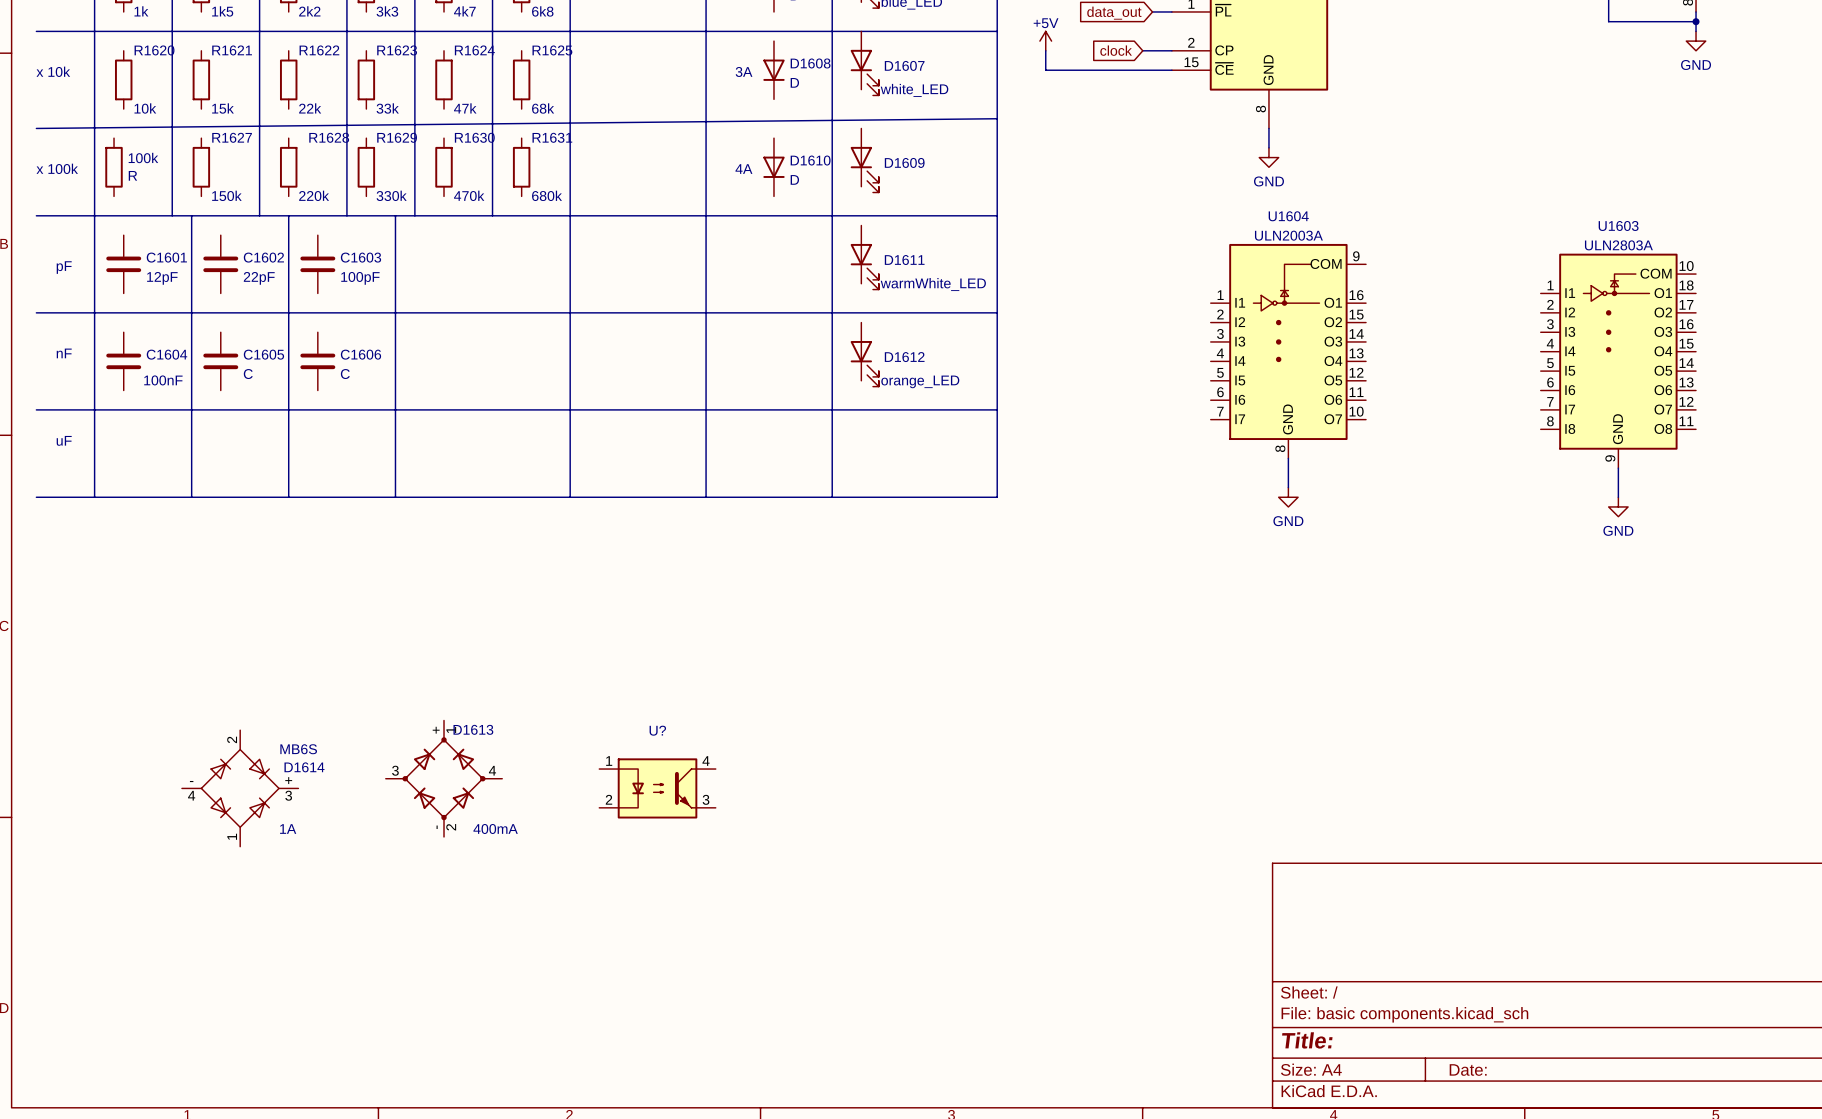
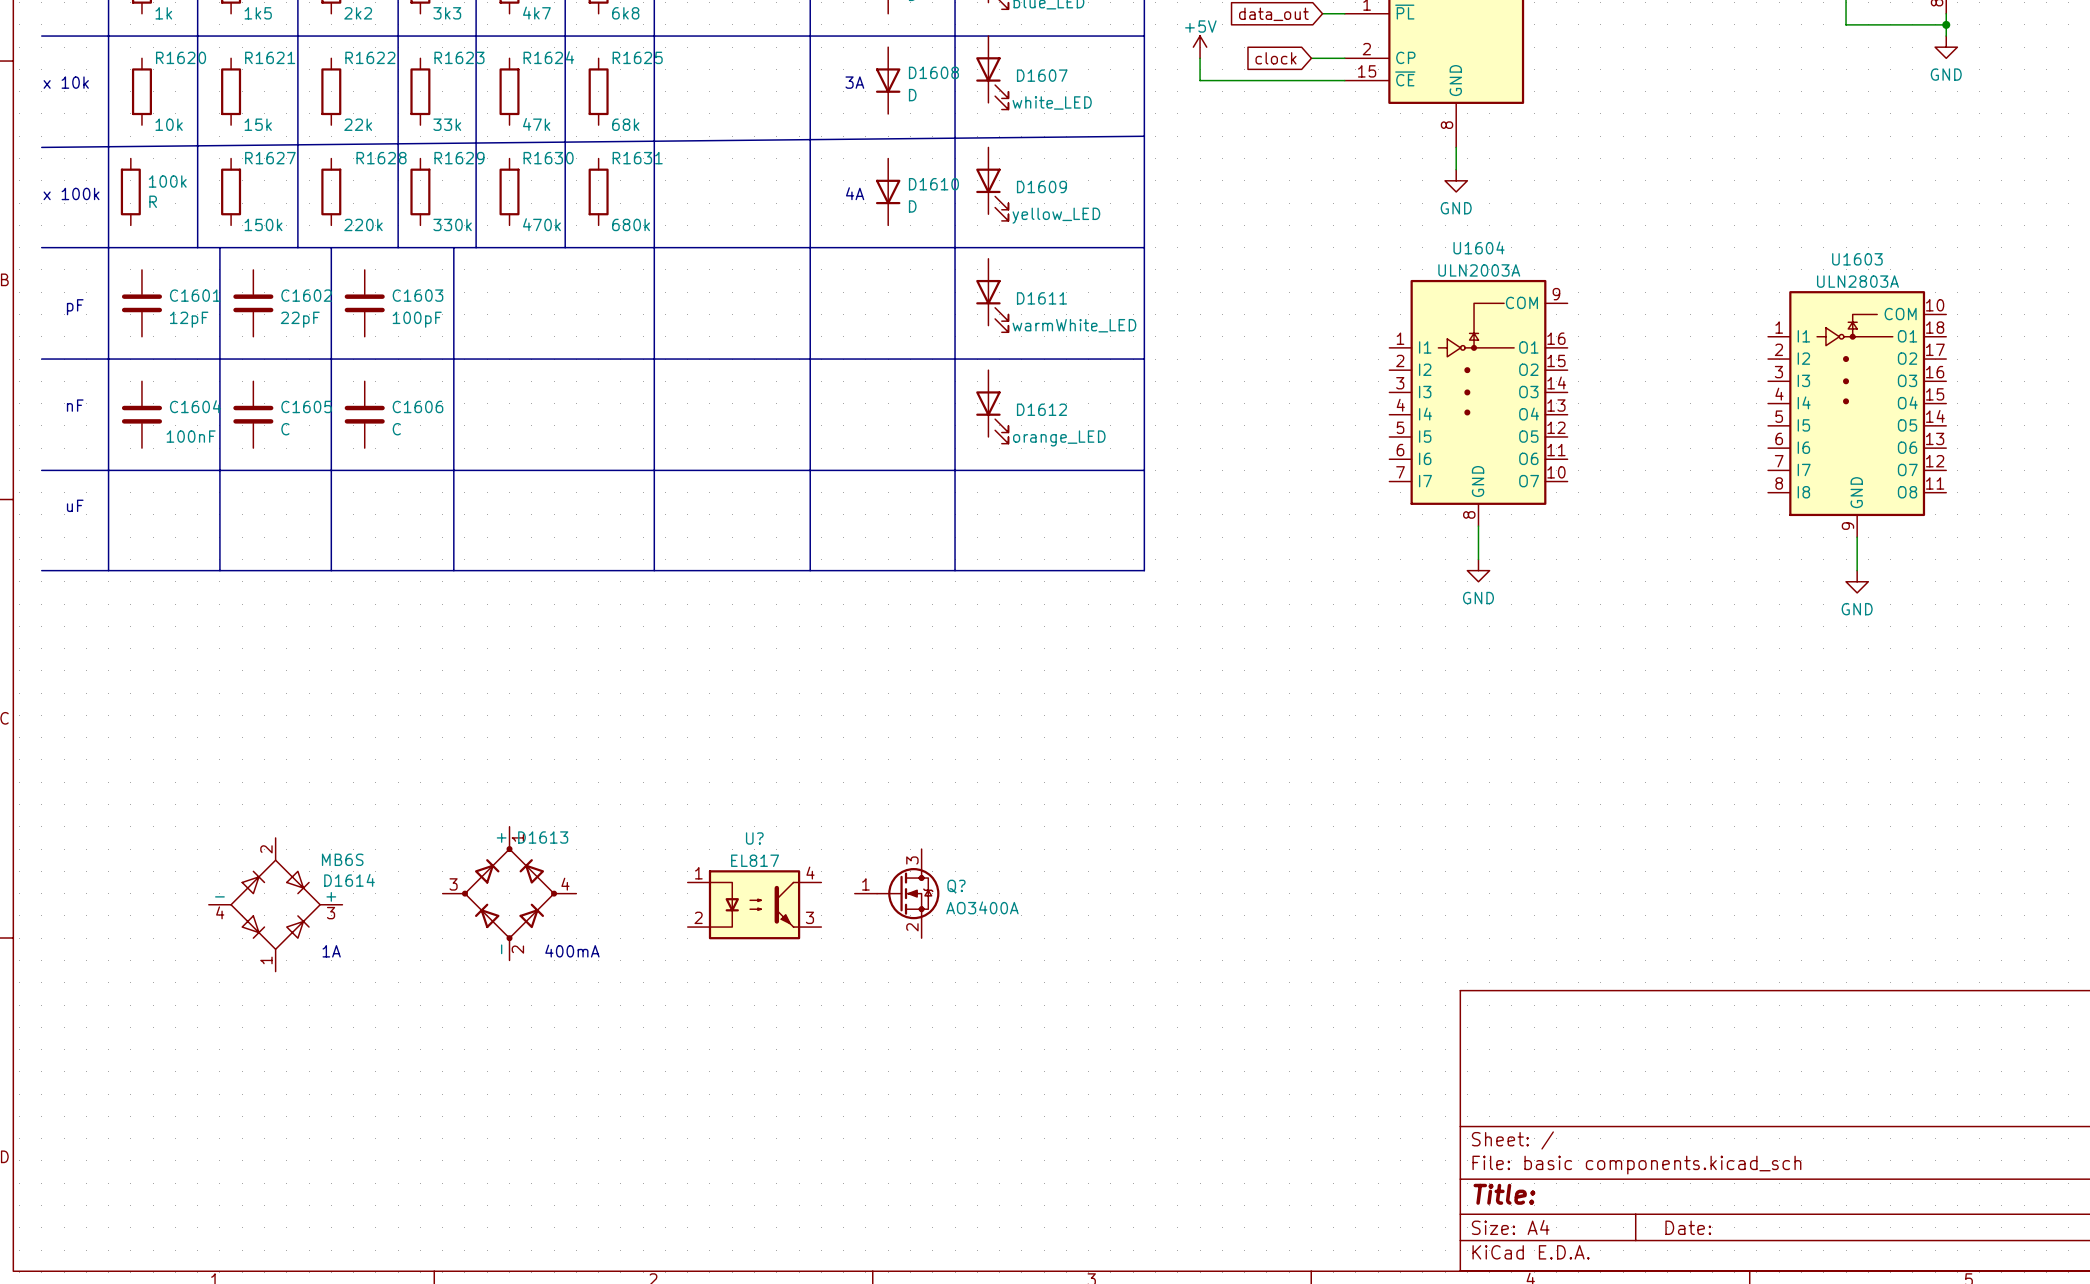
D1609 value: none -> yellow_LED (1056, 215)
U? value: none -> EL817 (755, 860)
Q?: none -> AO3400A (897, 893)

